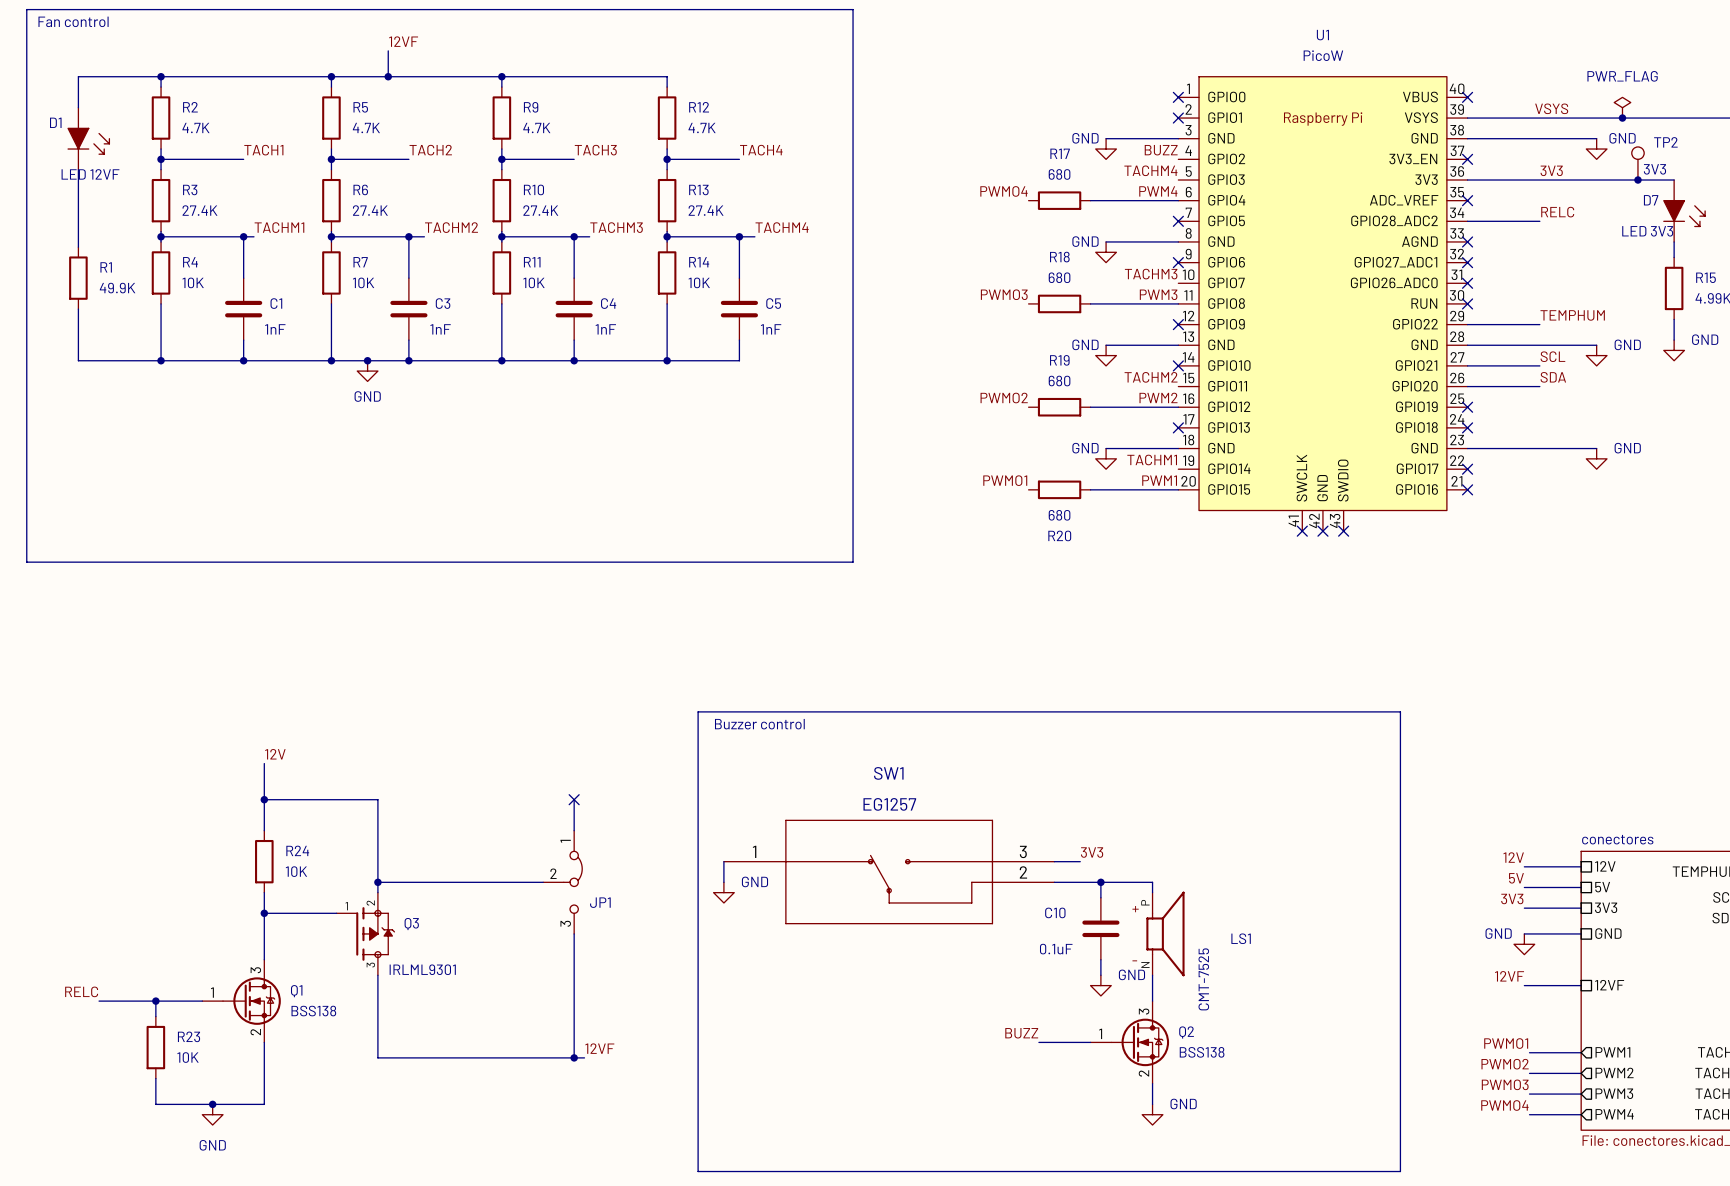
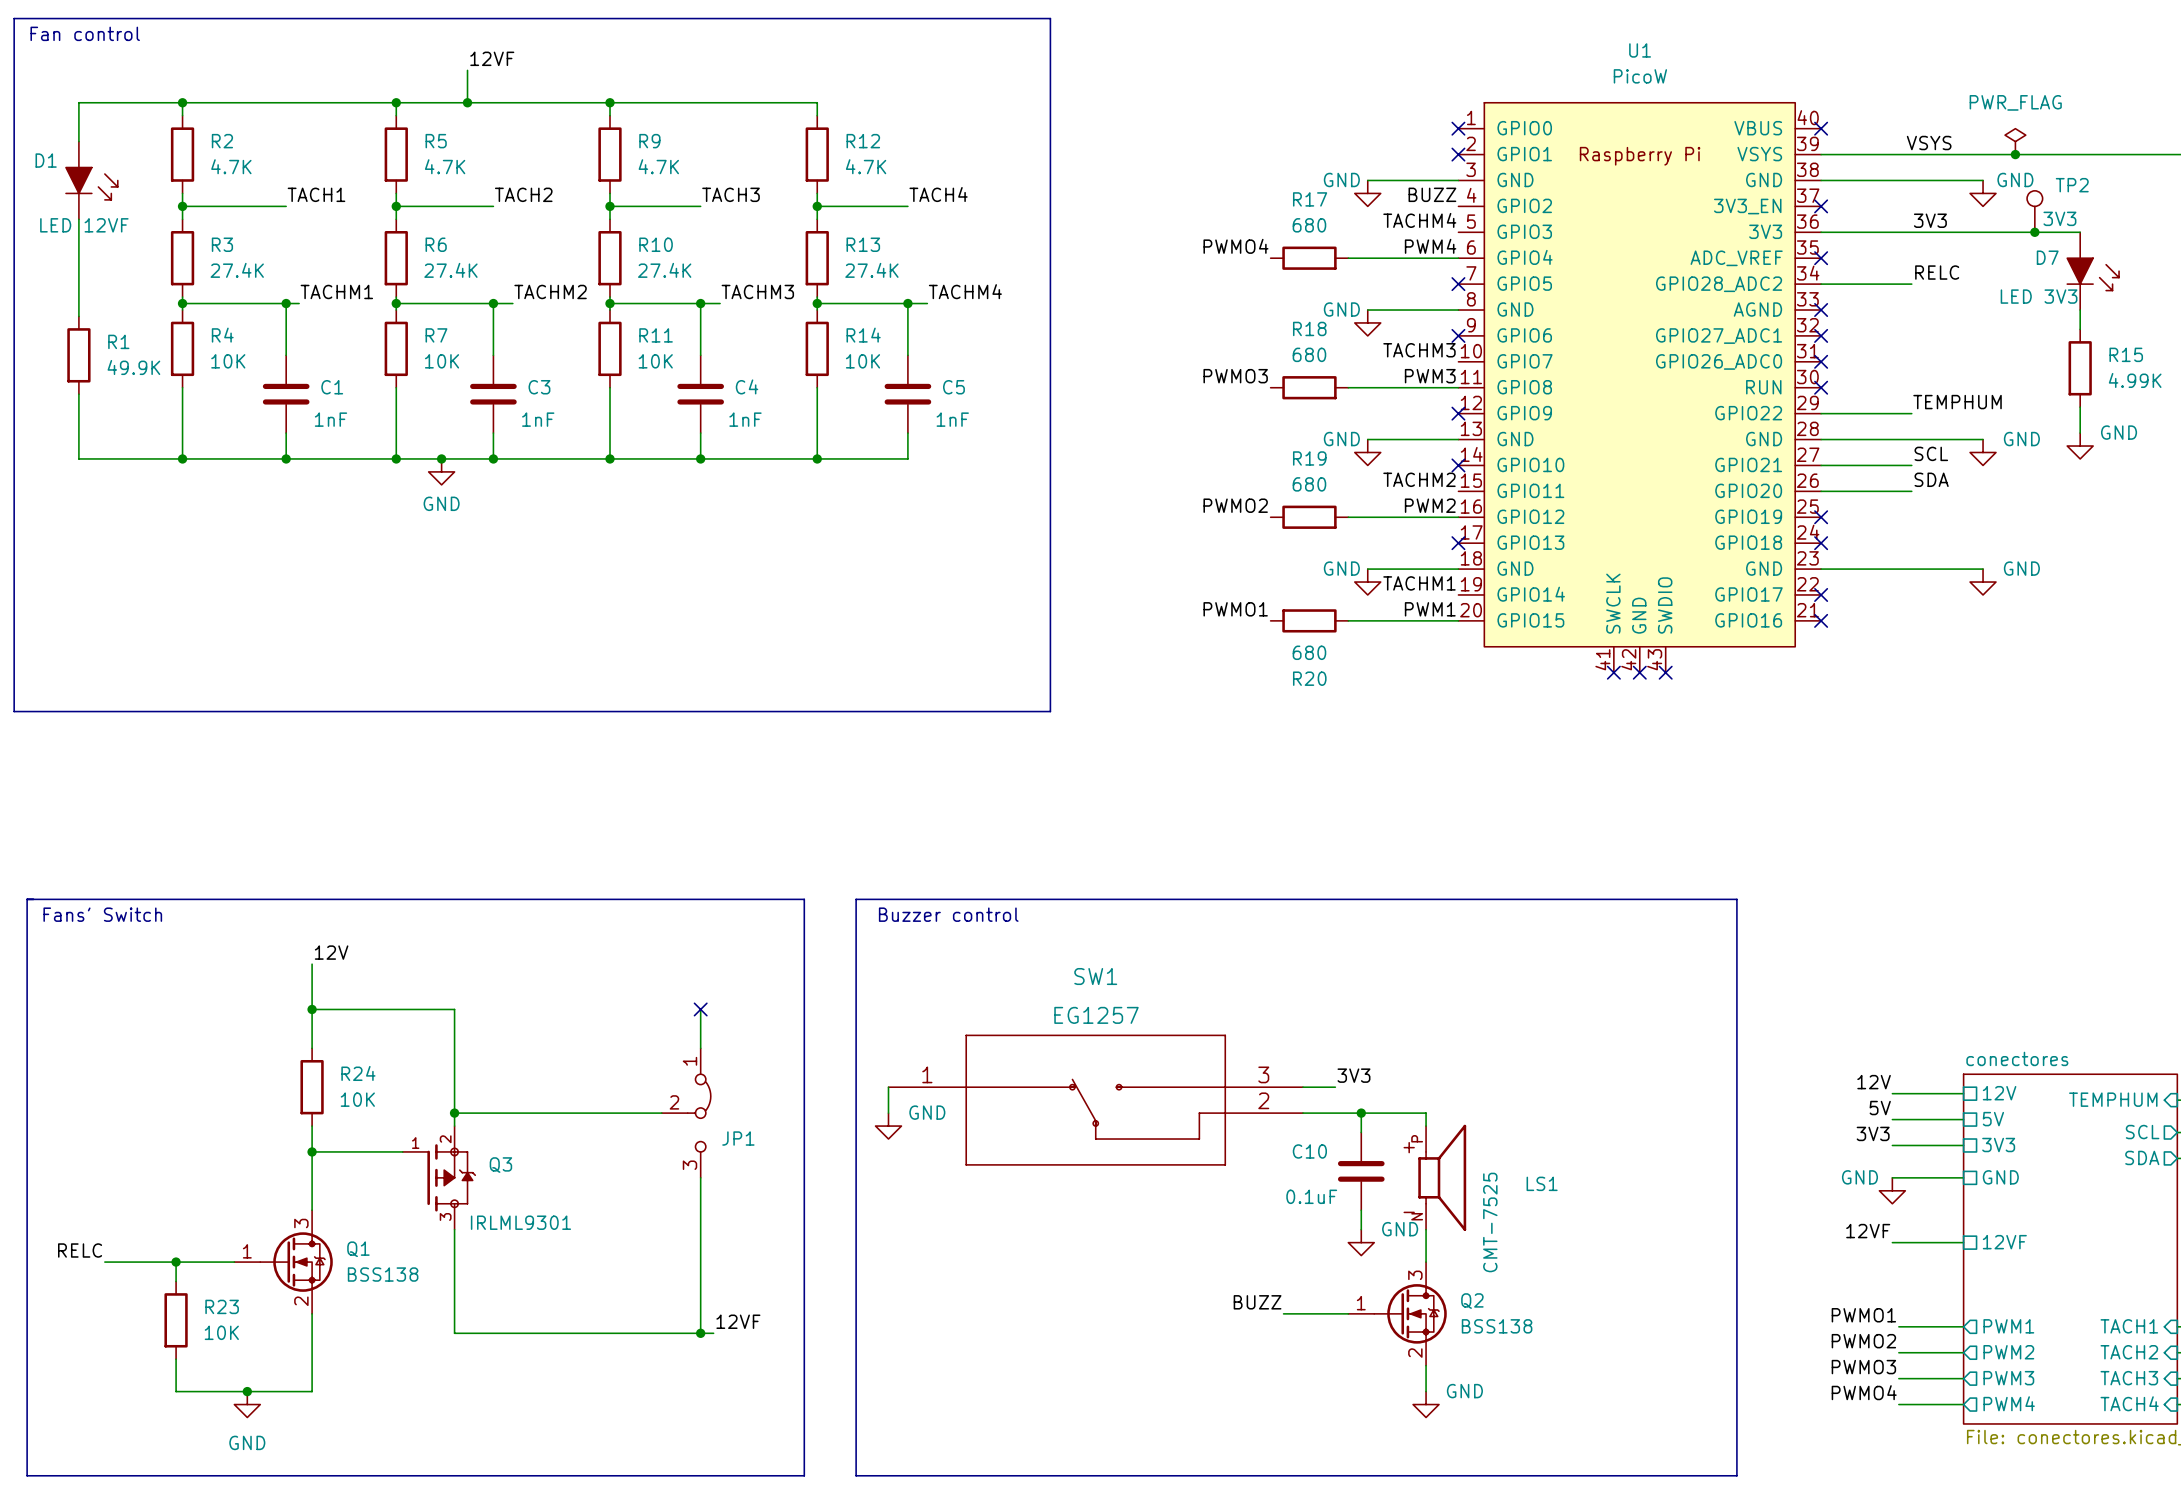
line: none -> (27, 899) (804, 899) (804, 1475) (27, 1475) (27, 899)
text: none -> Fans' Switch (102, 914)

